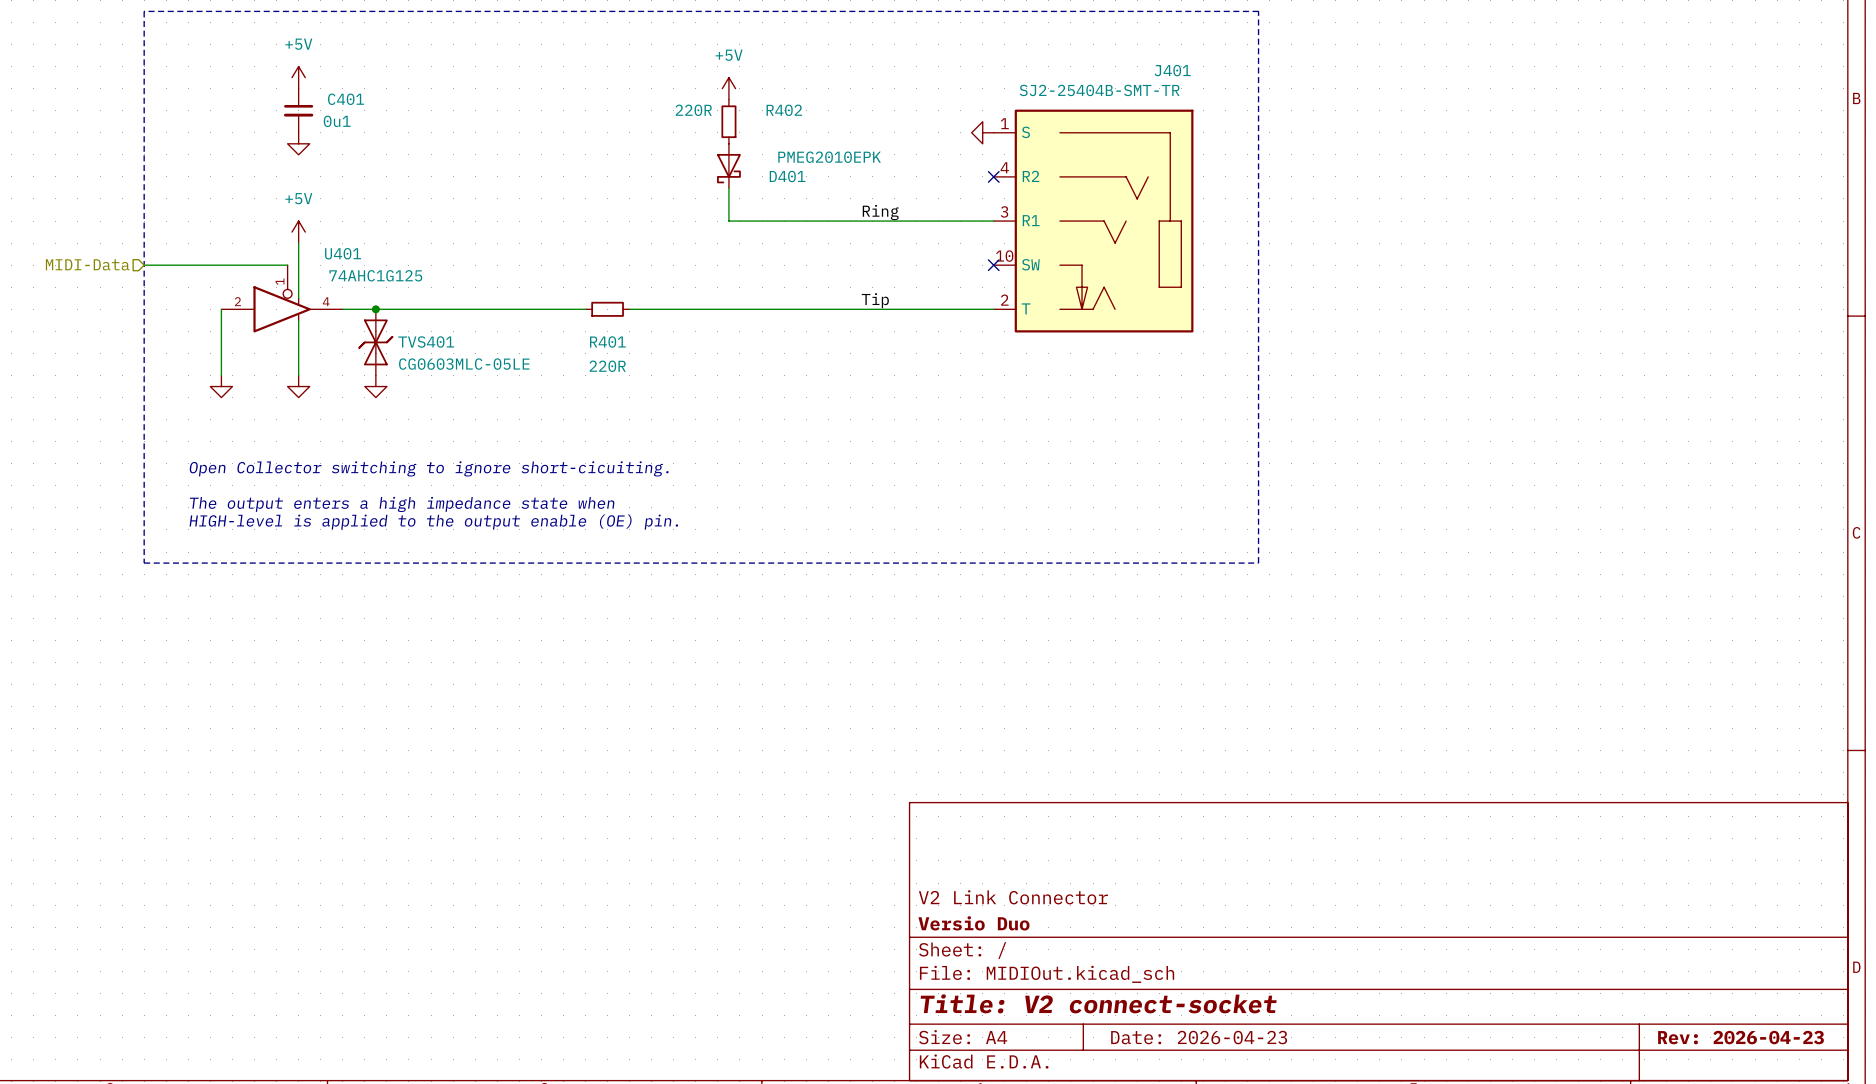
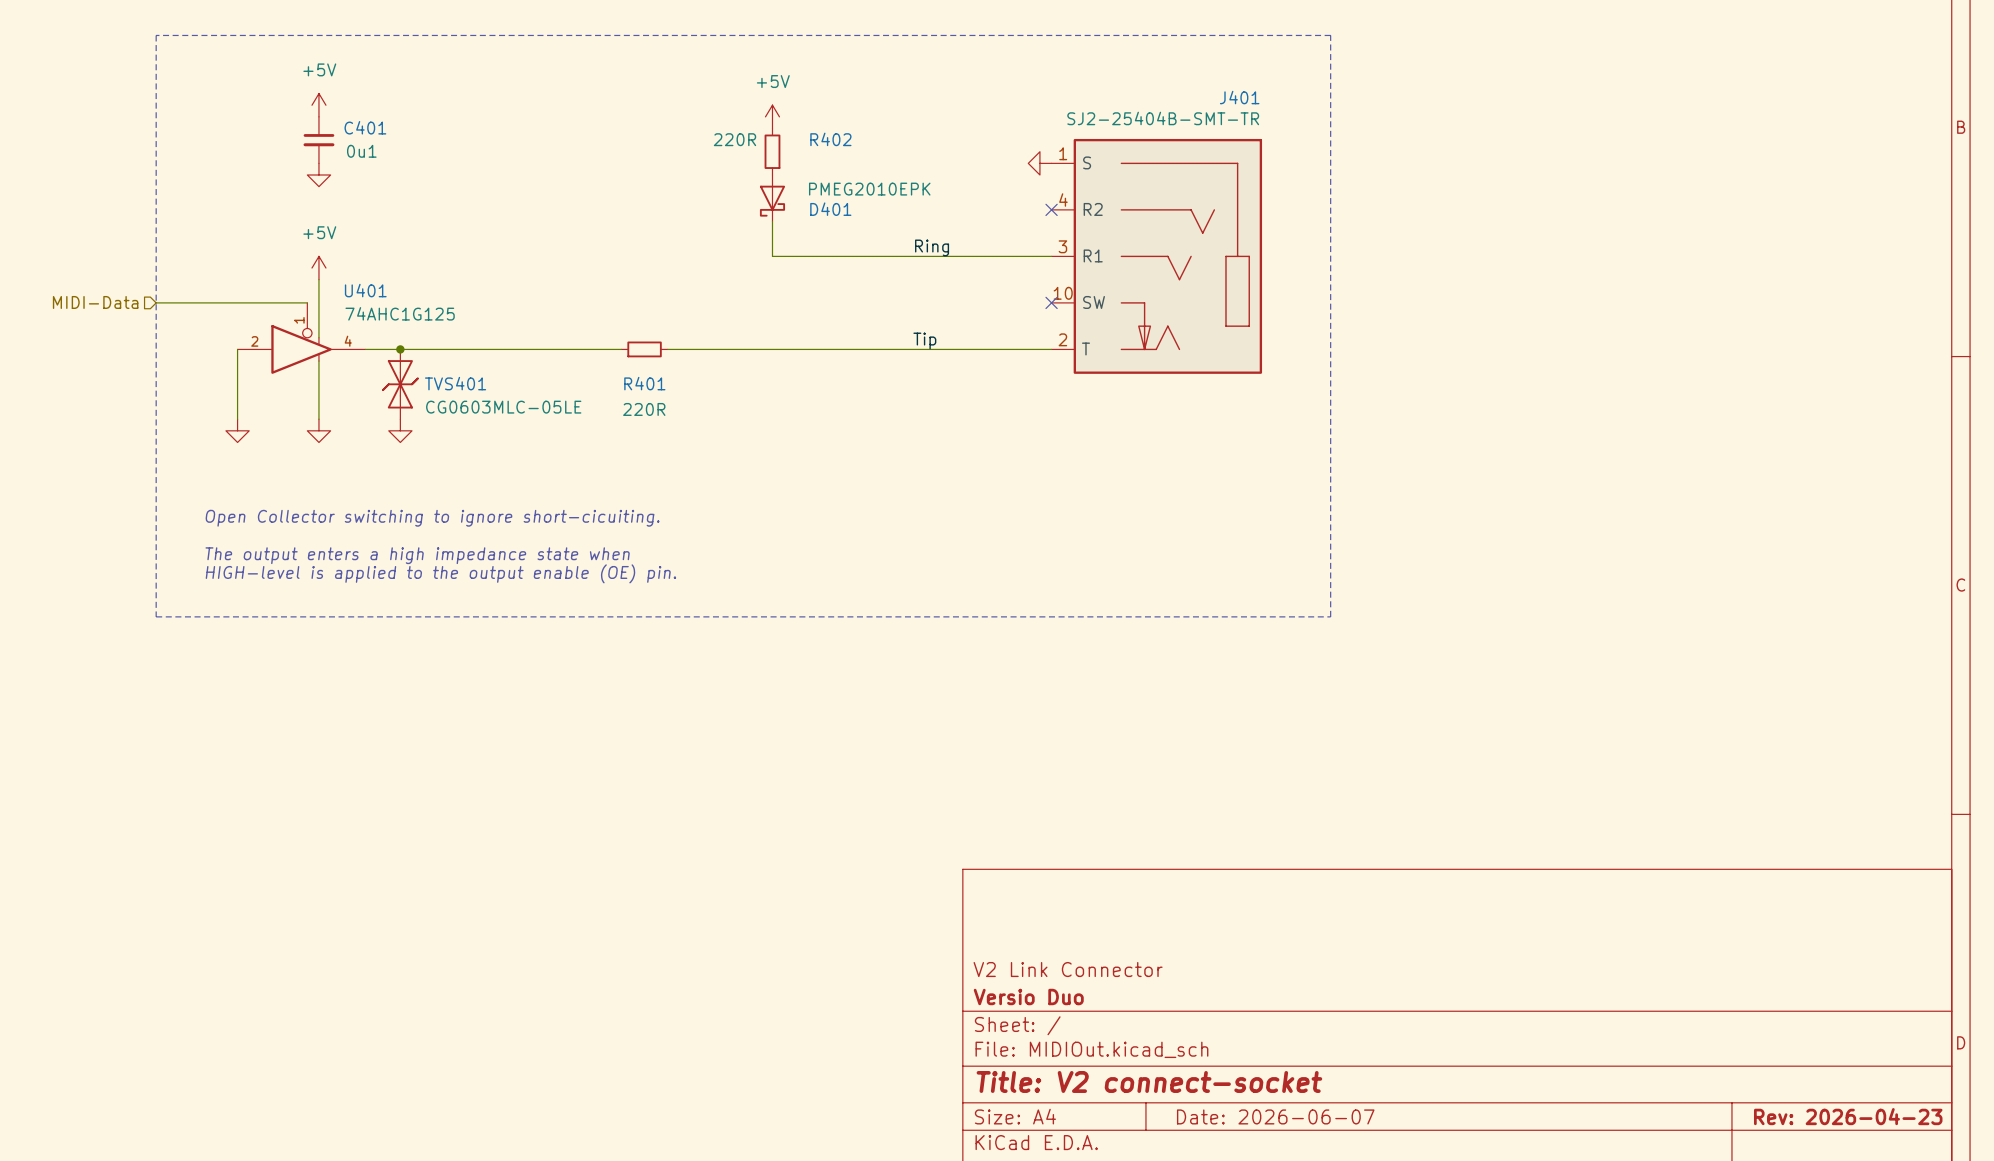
title block: Date: 2026-04-23 (1199, 1037) -> Date: 2026-06-07 (1275, 1116)

